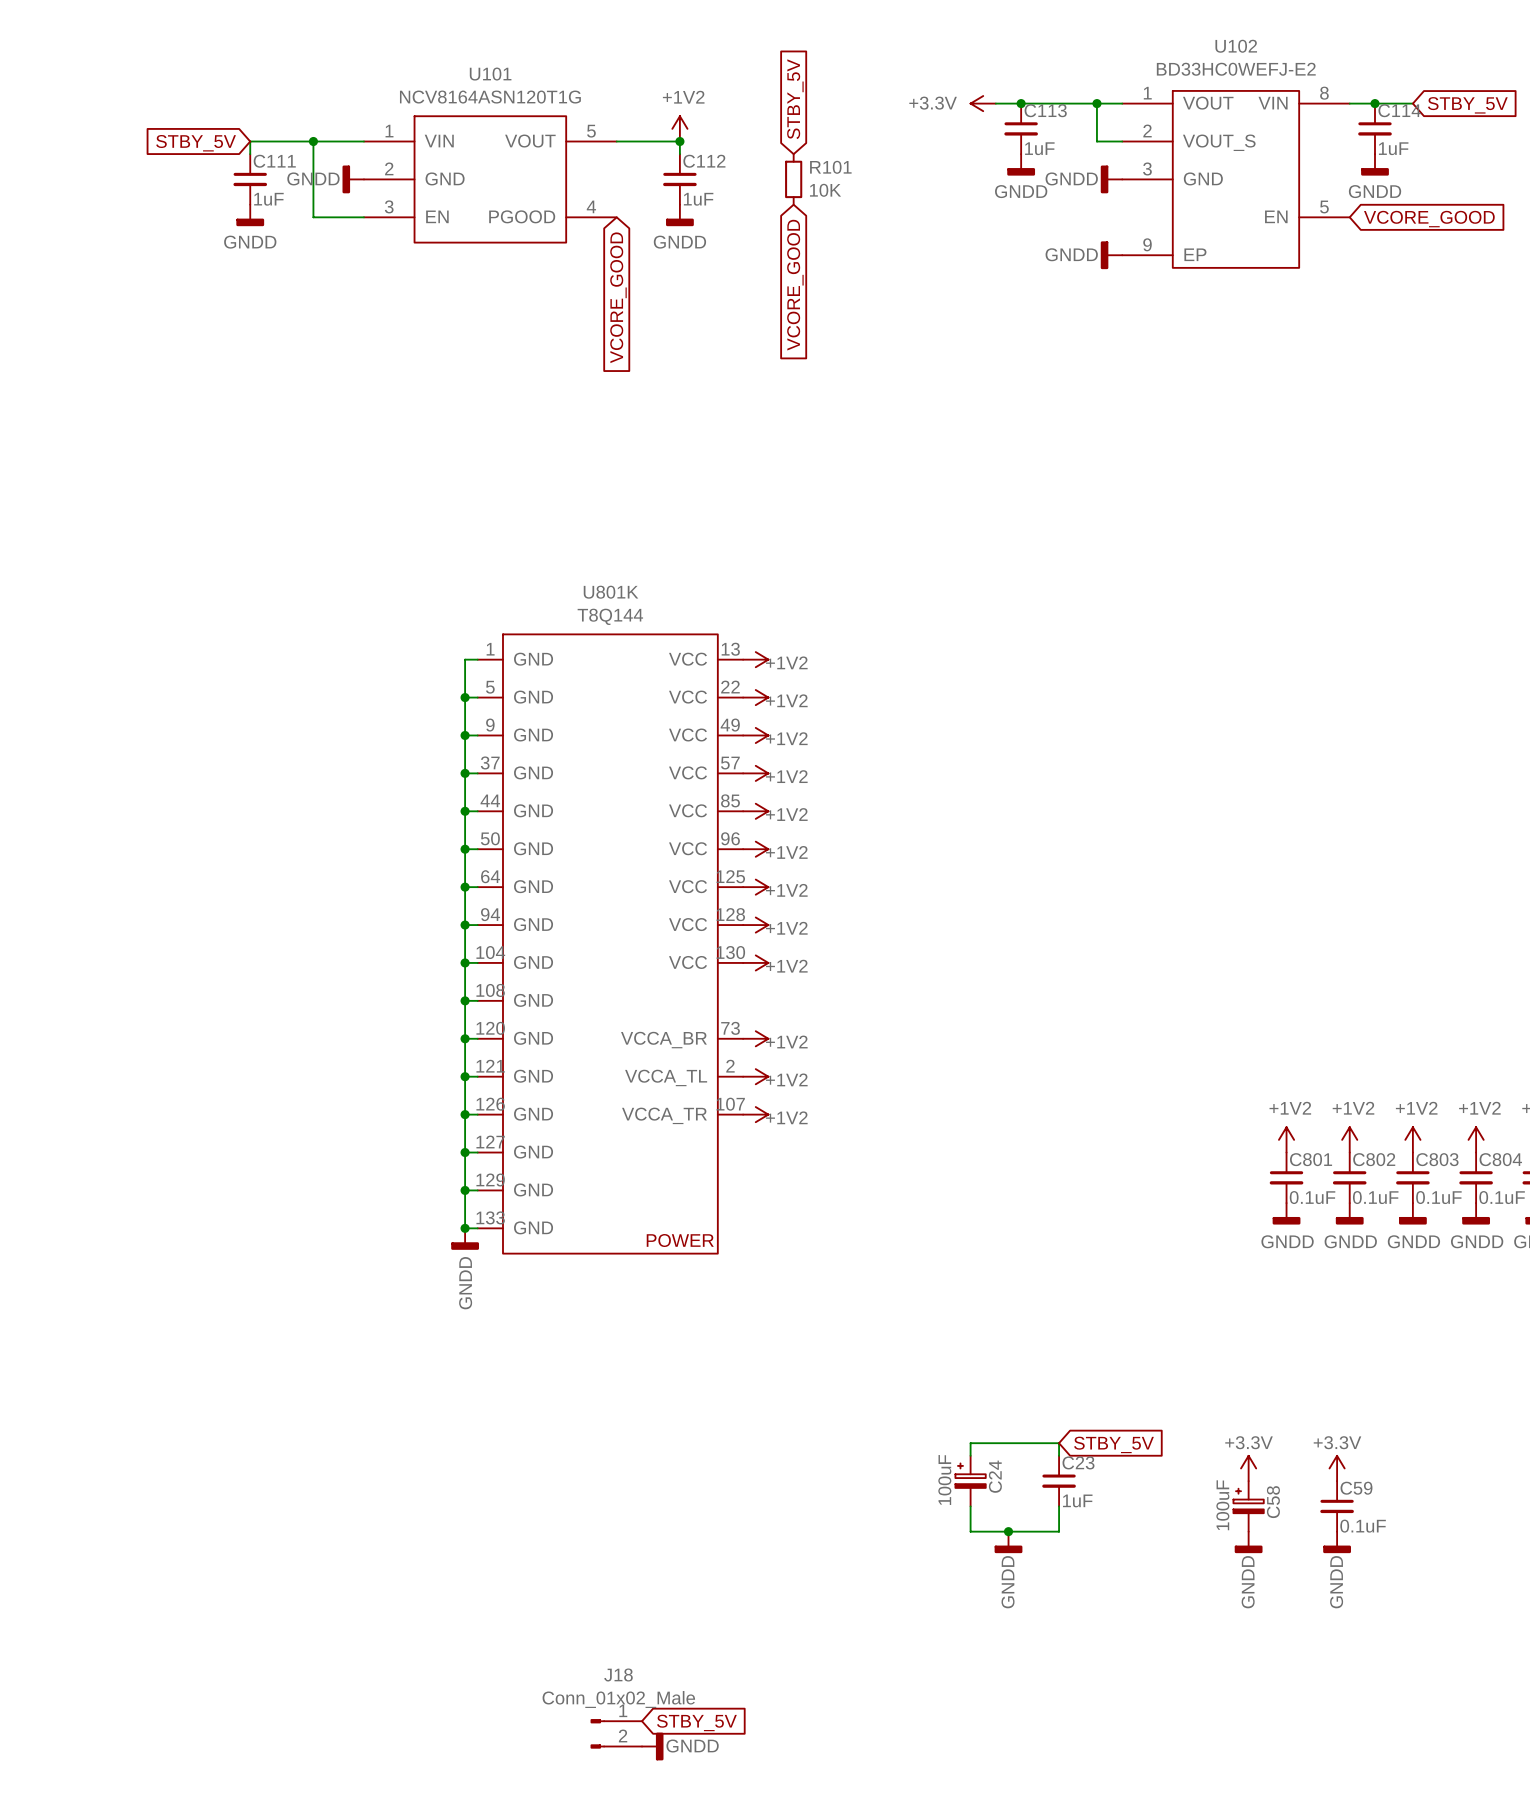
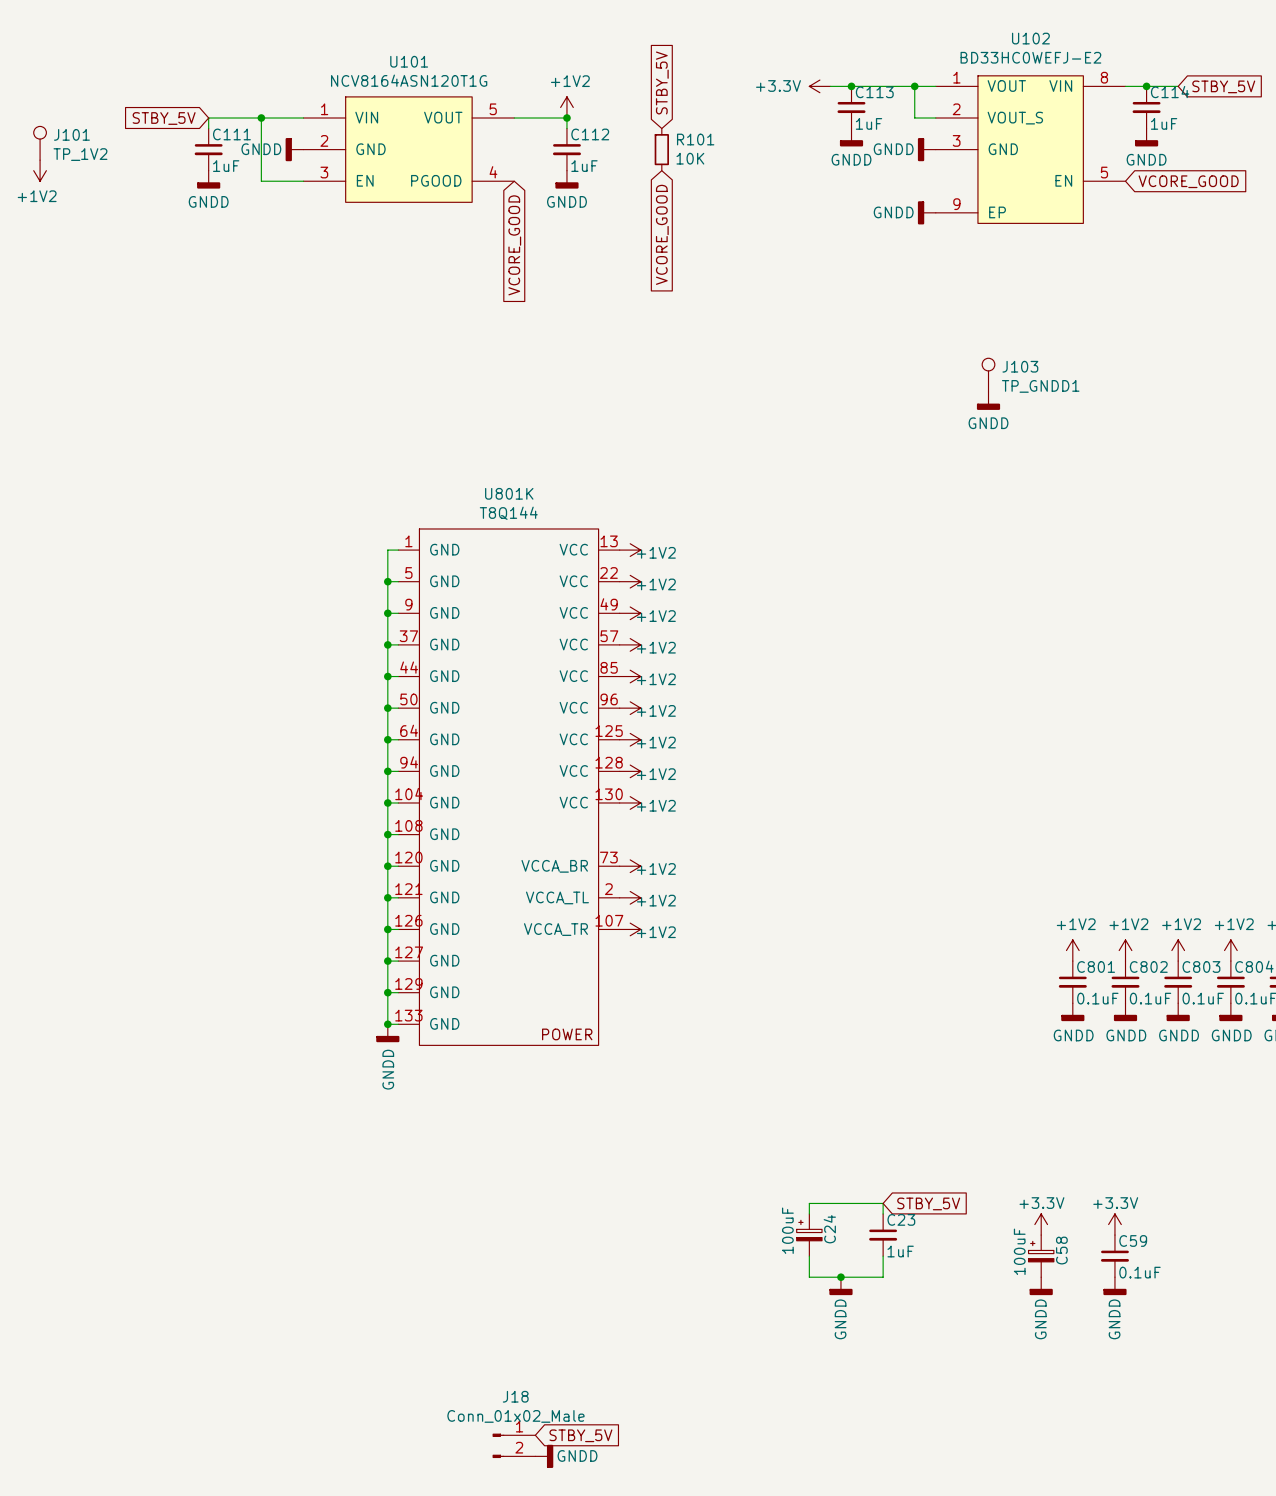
J101: none -> TP_1V2 (40, 143)
power symbol: none -> +1V2 (40, 170)
J103: none -> TP_GNDD1 (988, 375)
power symbol: none -> GNDD (988, 400)

